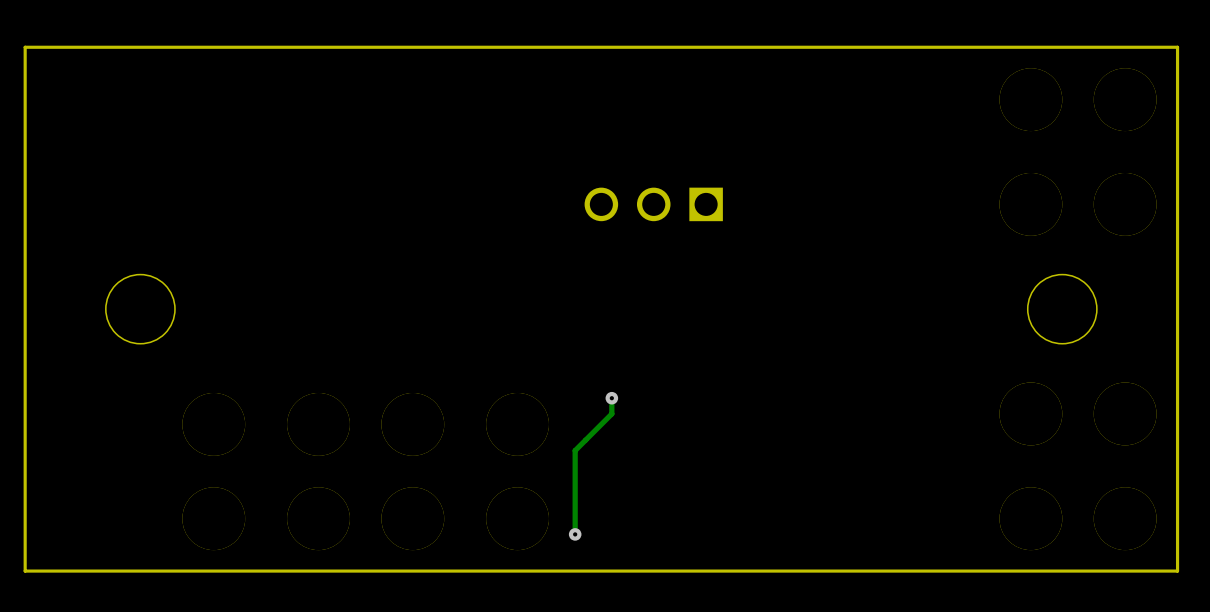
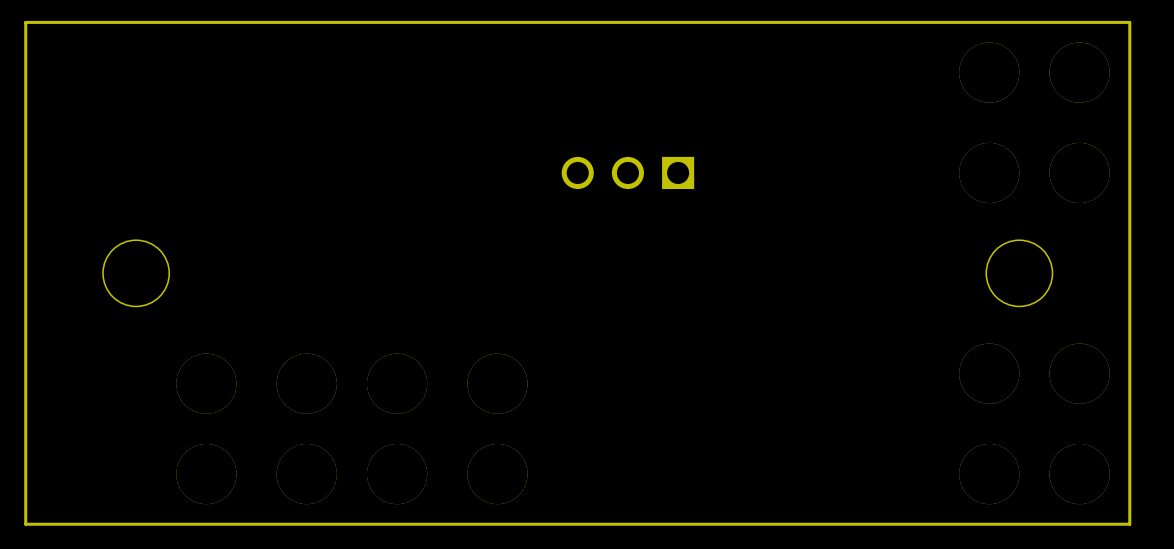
track: (611, 398) (611, 413) (575, 450) (575, 534) -> none
via: (611, 398) -> none
via: (575, 534) -> none

